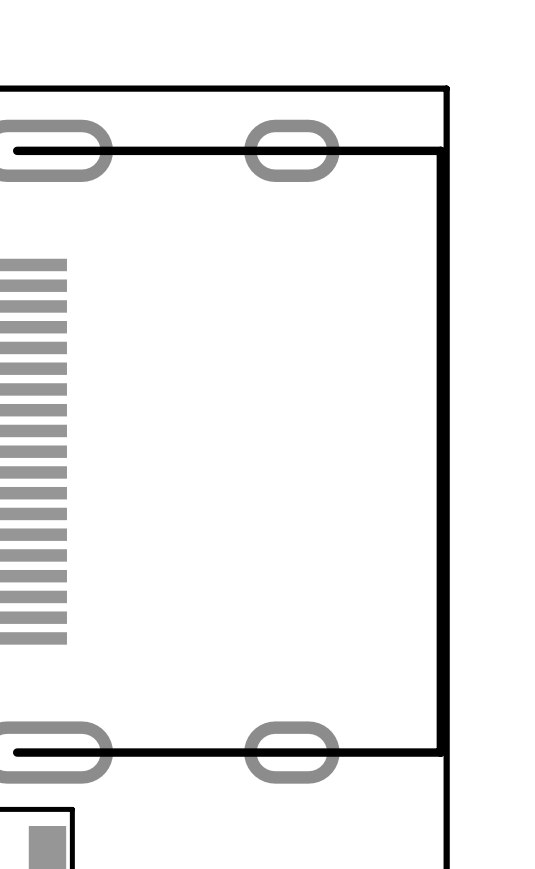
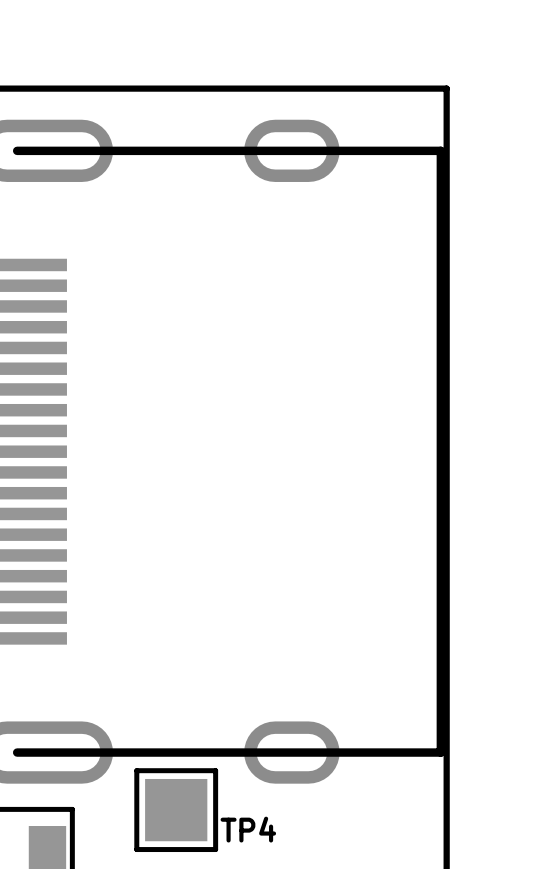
TP4: none -> (176, 810)

